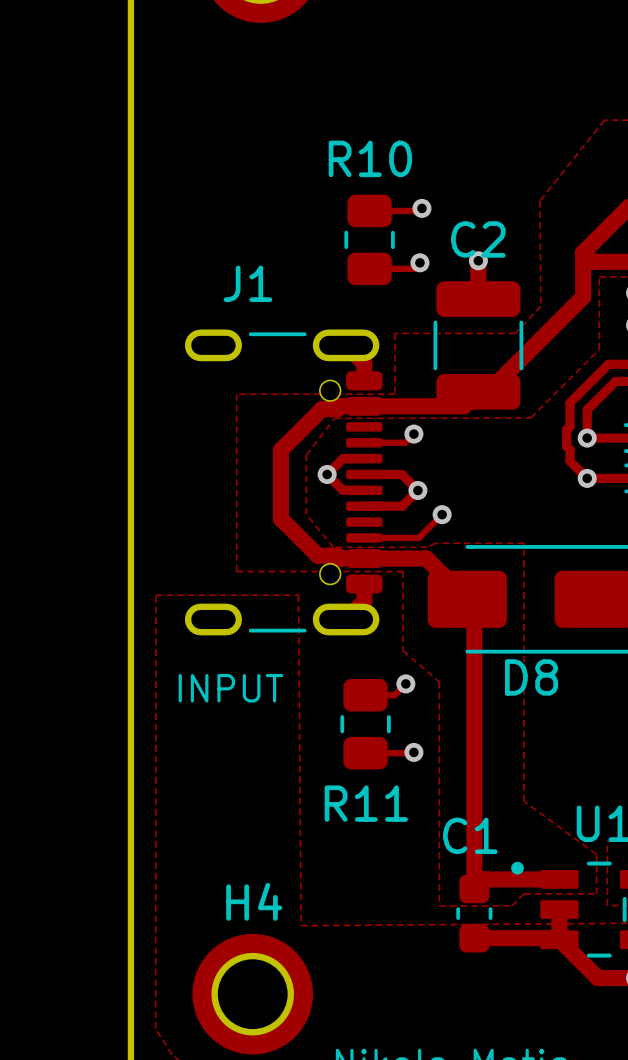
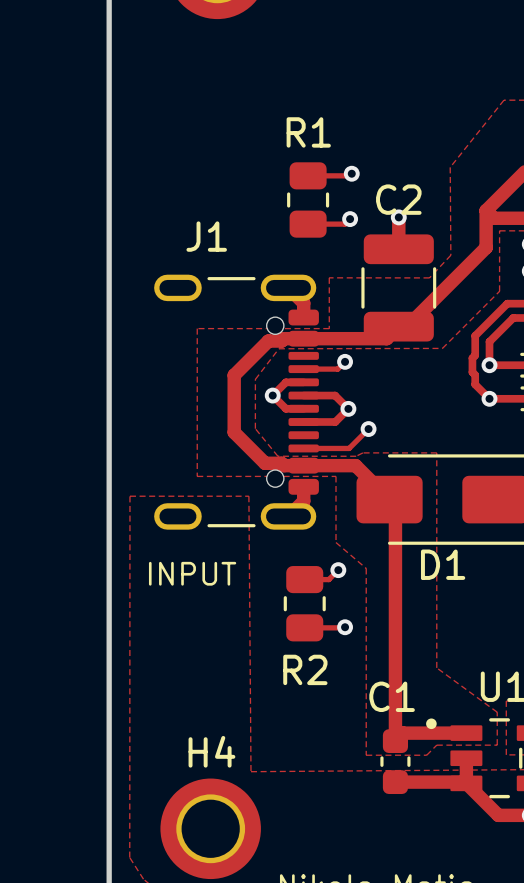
R10 name: R10 (370, 158) -> R1 (308, 132)
D8 name: D8 (531, 677) -> D1 (443, 564)
R11 name: R11 (366, 803) -> R2 (305, 669)

